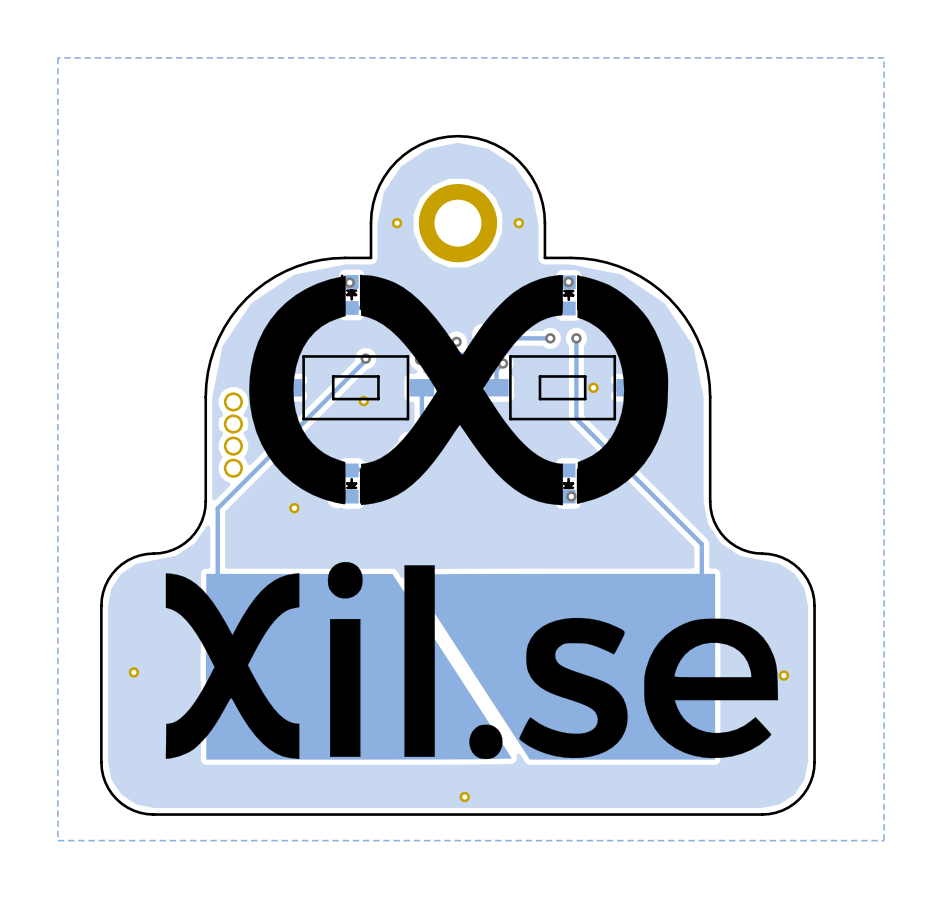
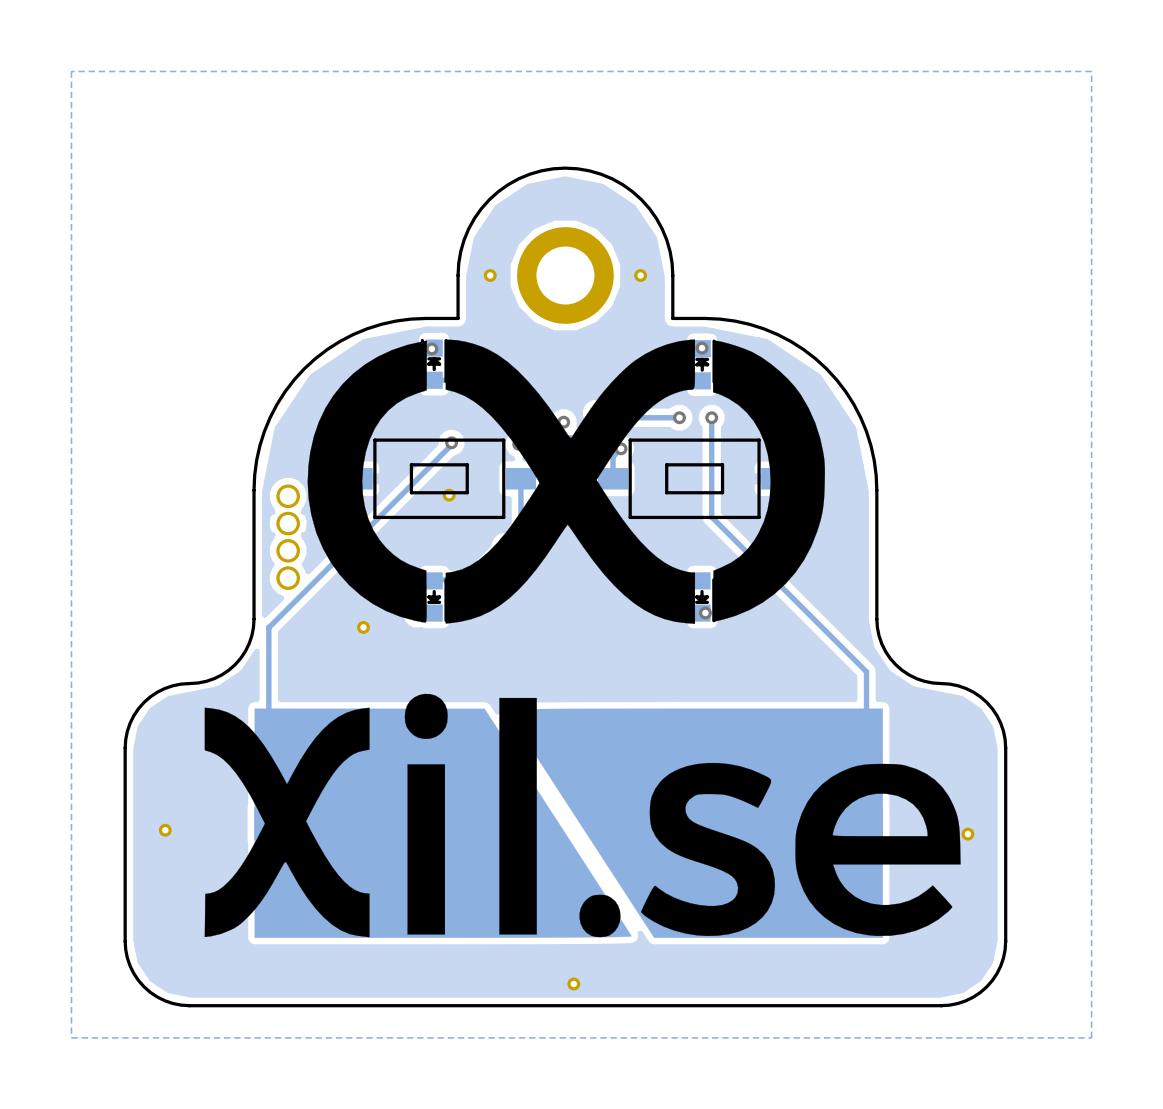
part: (593, 387) -> none

